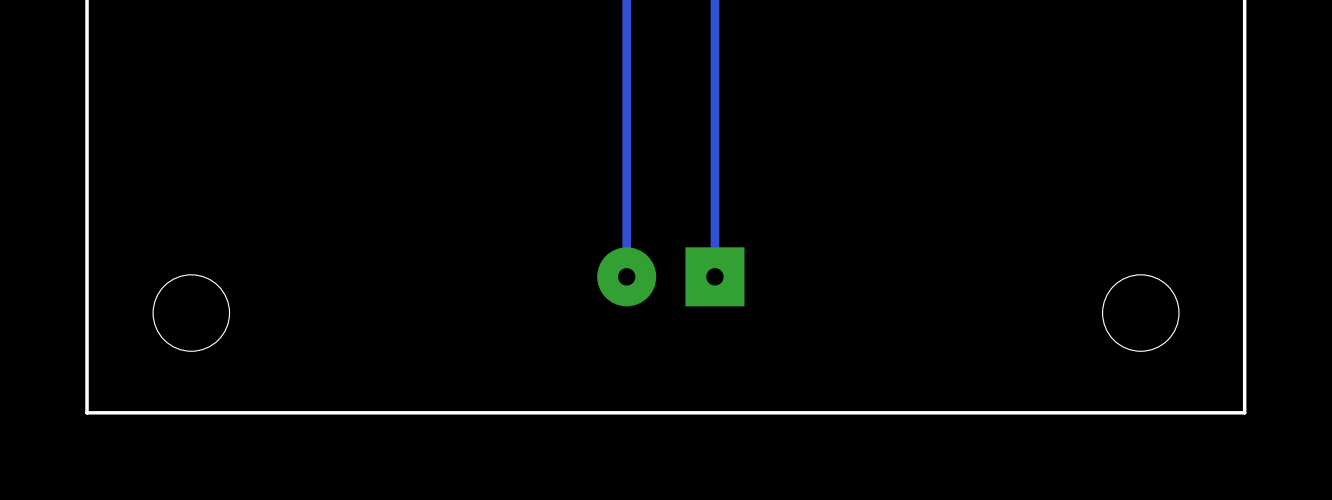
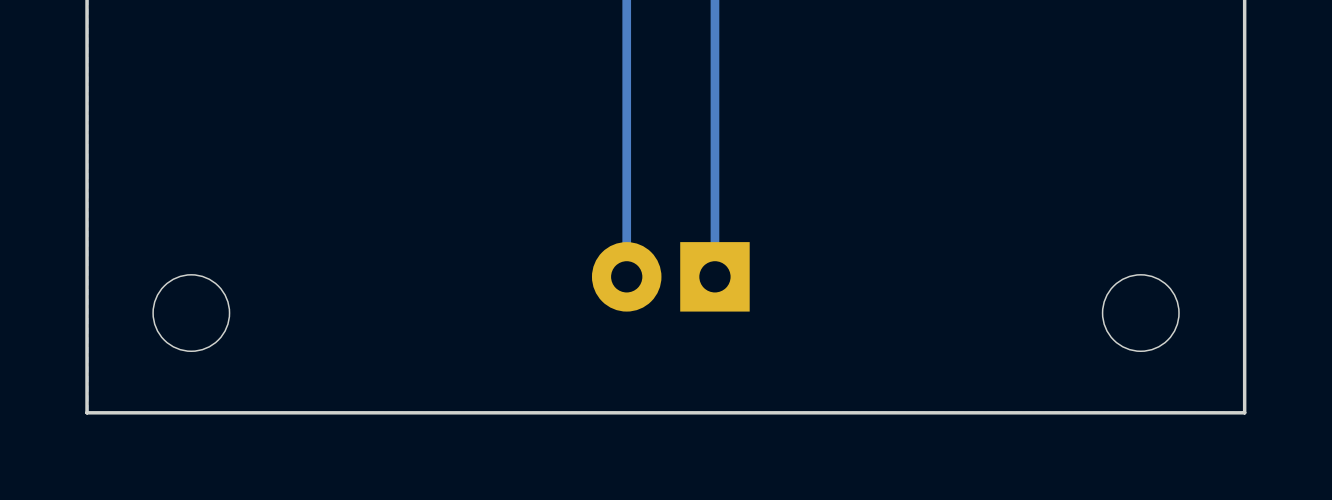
part footprint: [597, 247, 745, 307] -> [591, 242, 750, 312]

